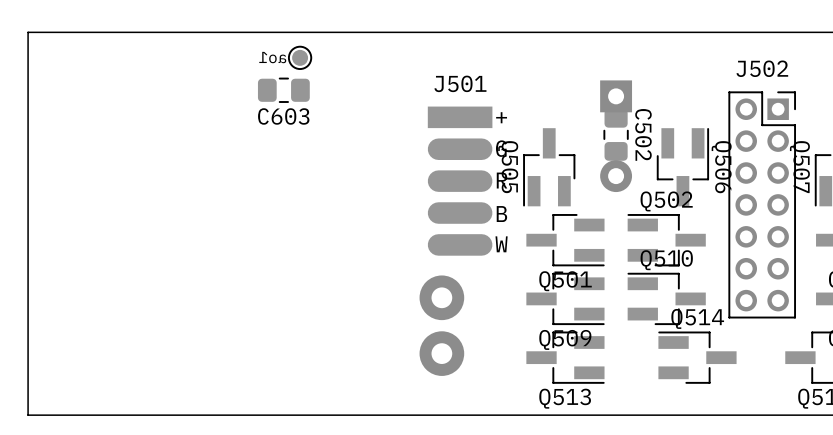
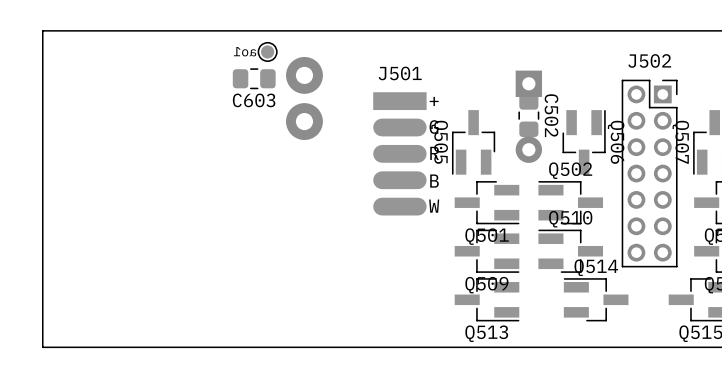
part position: (441, 325) -> (304, 98)

